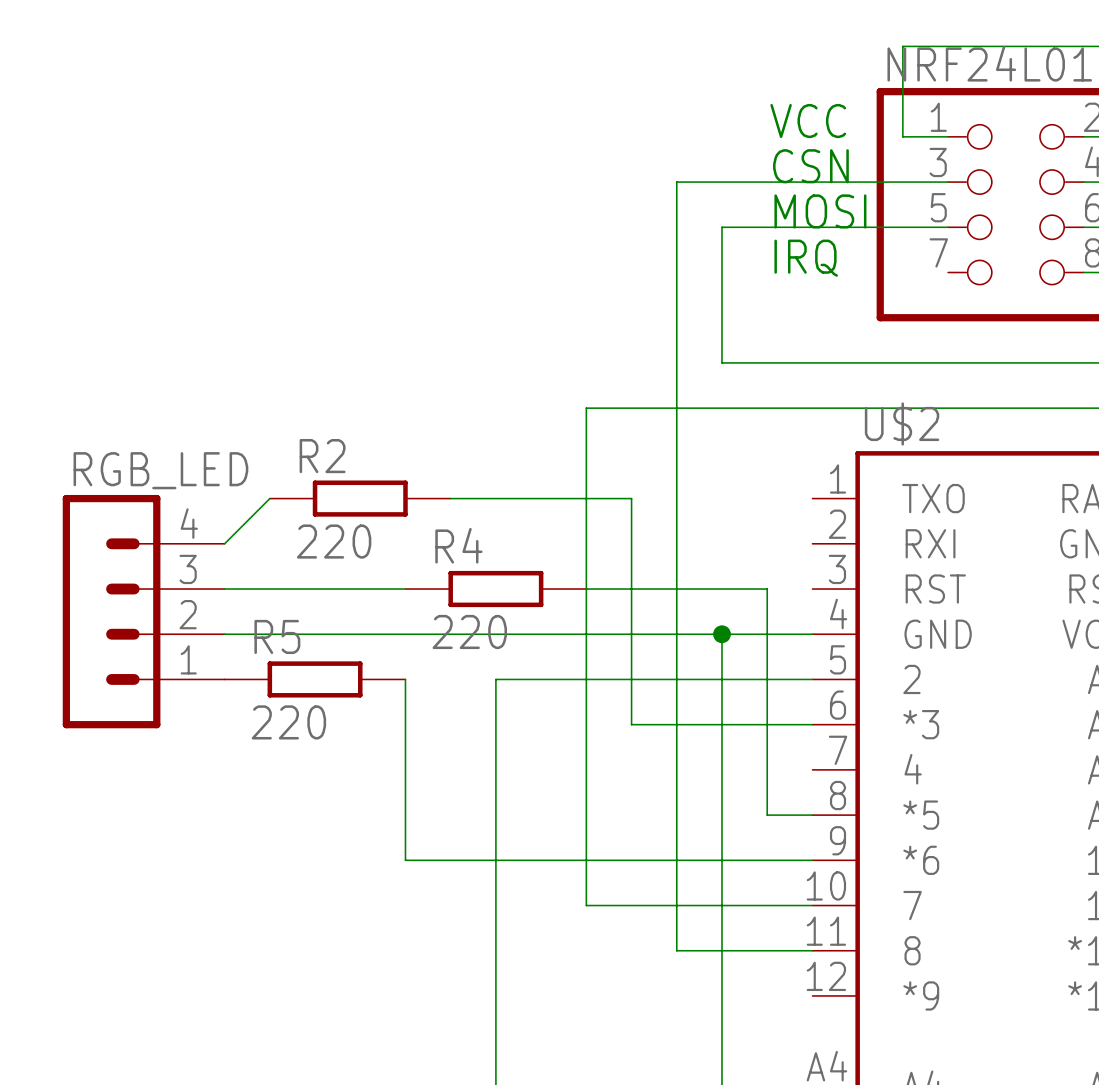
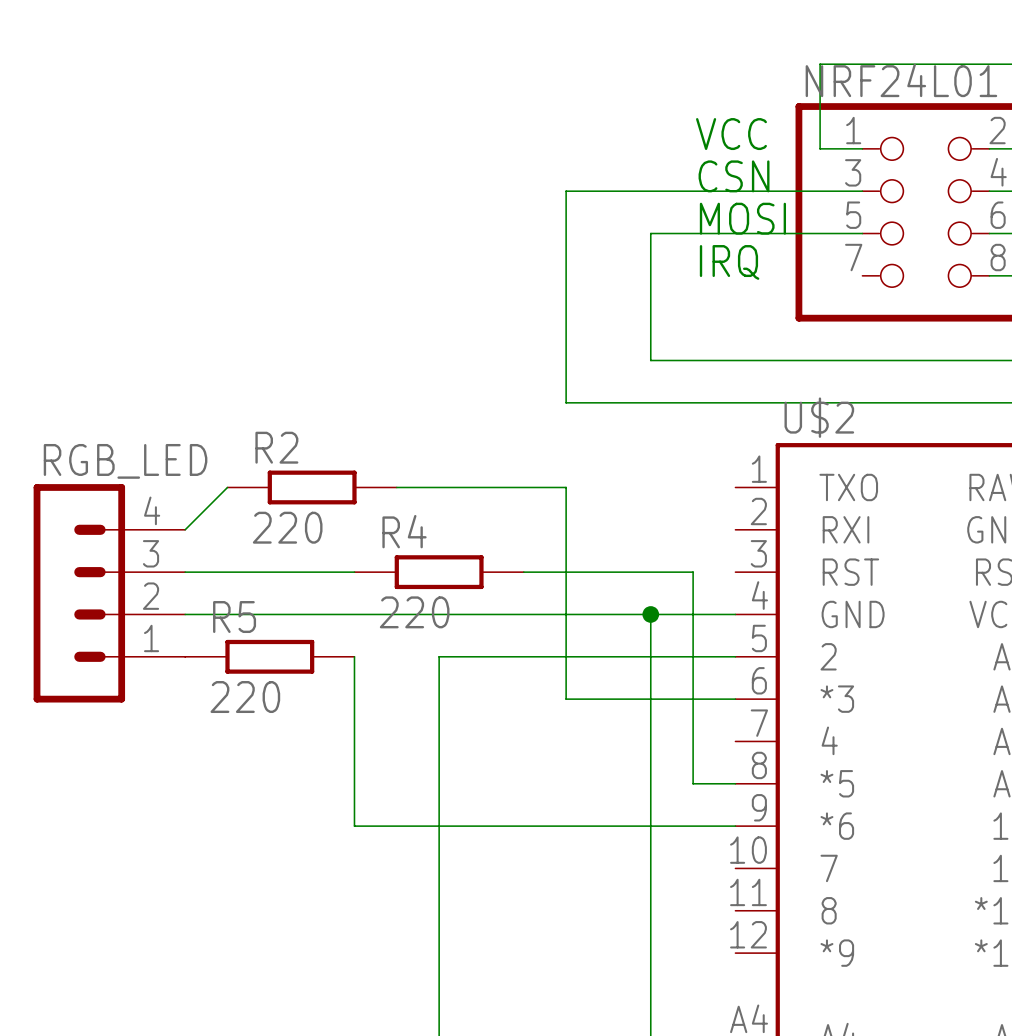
wire: (676, 182) (676, 950) (812, 950) -> (608, 191) (566, 191) (566, 402)
wire: (631, 408) (586, 408) (586, 905) (812, 905) -> none

